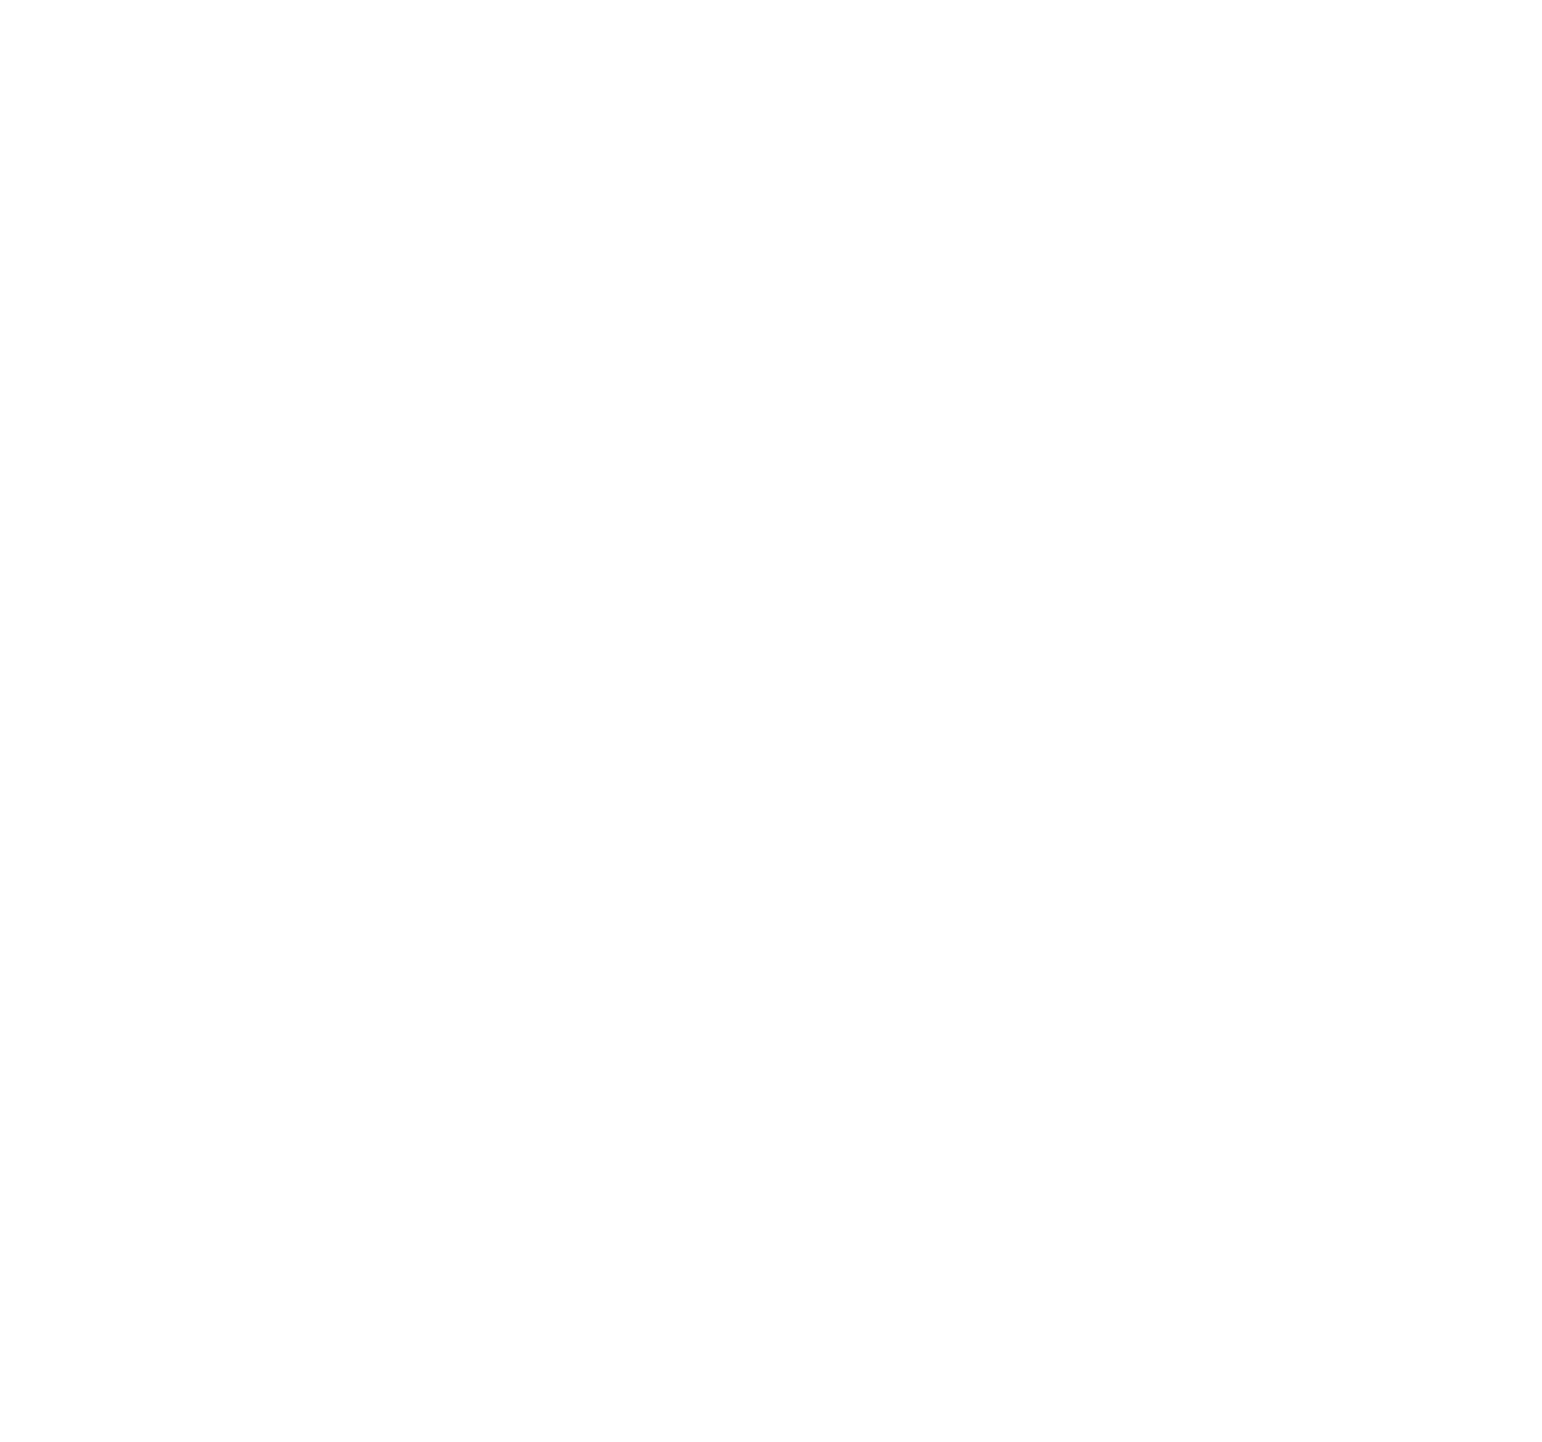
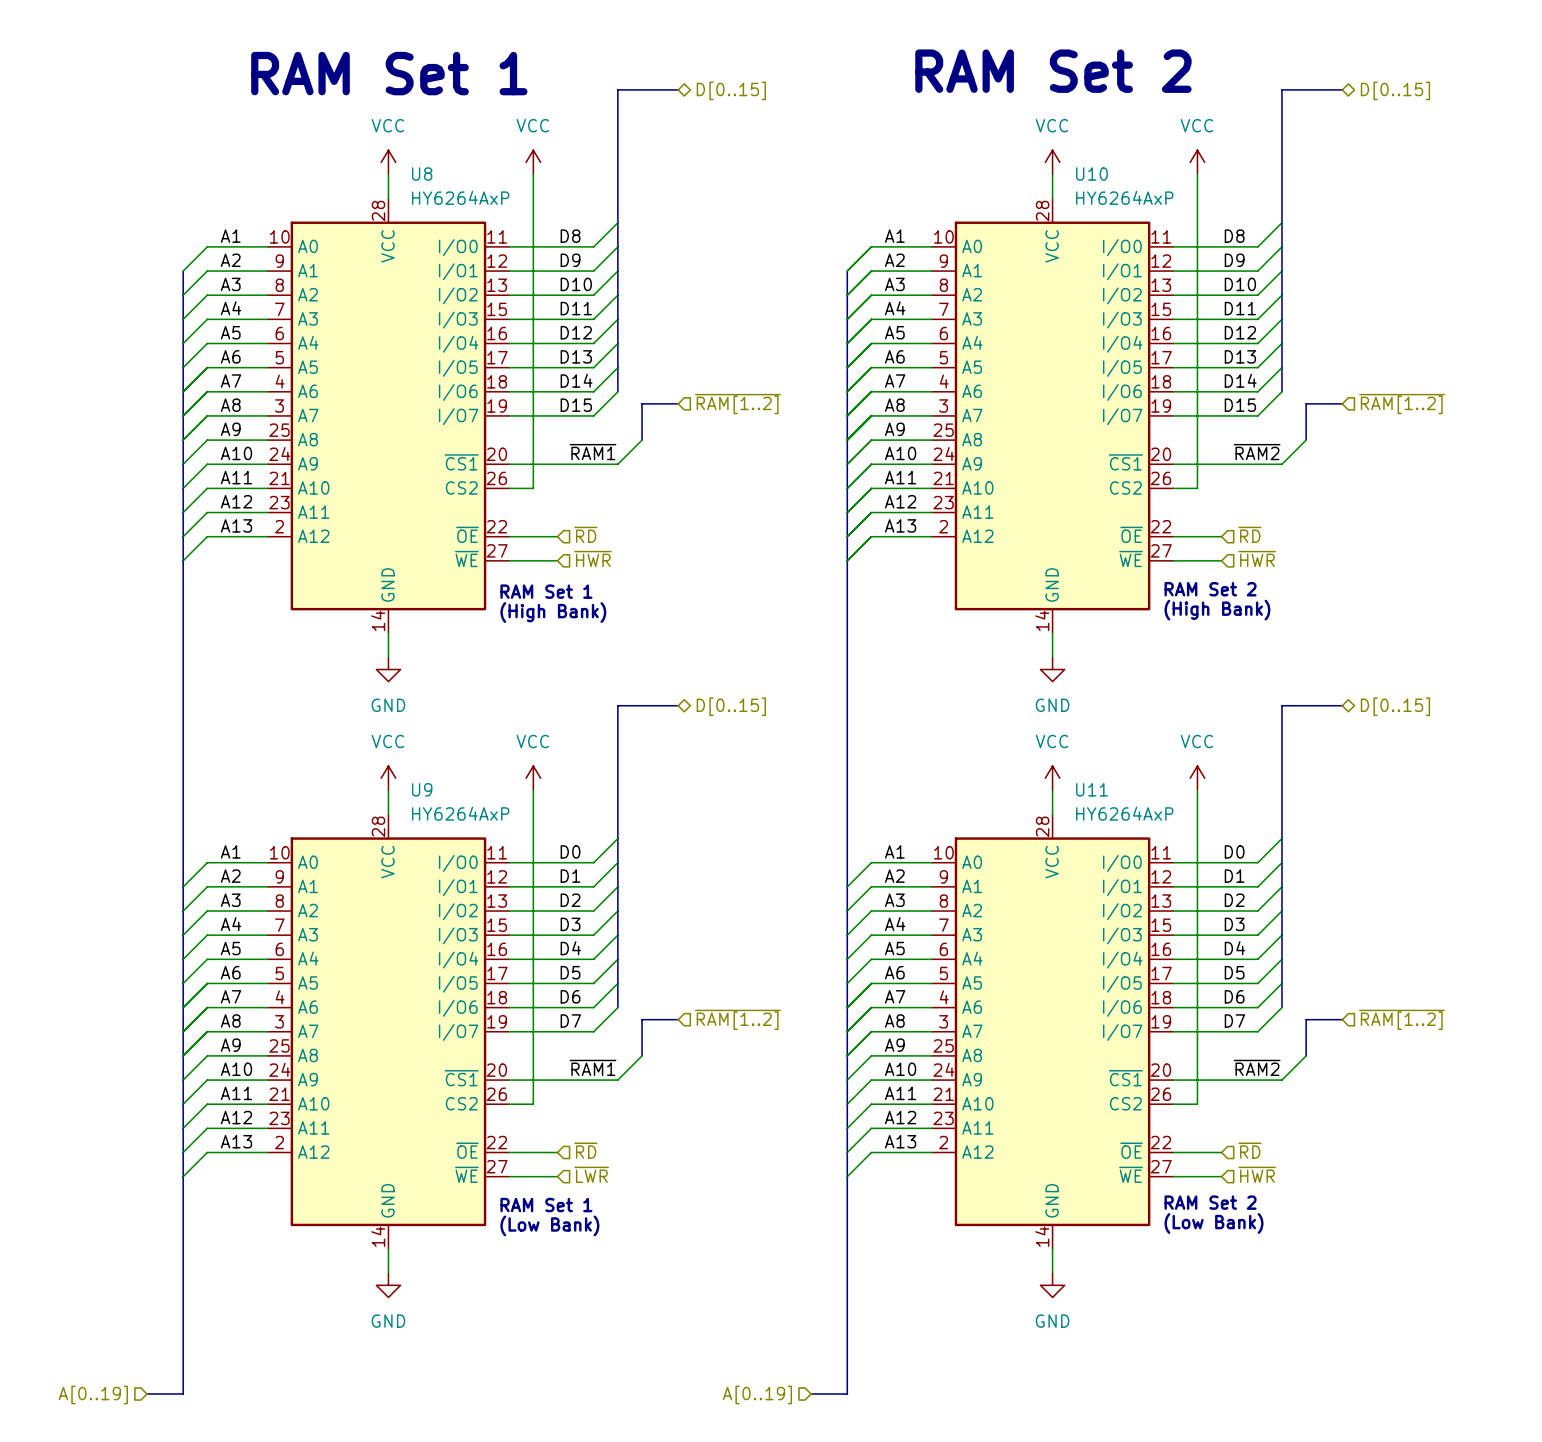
text: none -> RAM Set 2 (1053, 71)
text: none -> RAM Set 1 (389, 73)
bus: none -> (678, 89) (617, 89) (617, 391)
bus: none -> (1342, 89) (1281, 89) (1281, 391)
hierarchical label: none -> D[0..15] (731, 90)
hierarchical label: none -> D[0..15] (1395, 90)
power symbol: none -> VCC (388, 162)
power symbol: none -> VCC (533, 162)
power symbol: none -> VCC (1052, 162)
power symbol: none -> VCC (1197, 162)
wire: none -> (388, 174) (388, 198)
wire: none -> (533, 174) (533, 488) (509, 488)
wire: none -> (1052, 174) (1052, 198)
wire: none -> (1197, 174) (1197, 488) (1173, 488)
wire: none -> (617, 222) (593, 246) (509, 246)
wire: none -> (1281, 222) (1257, 246) (1173, 246)
label: none -> A1 (230, 236)
label: none -> D8 (570, 236)
label: none -> A1 (894, 236)
label: none -> D8 (1234, 236)
wire: none -> (267, 246) (207, 246) (183, 271)
wire: none -> (617, 246) (593, 271) (509, 271)
wire: none -> (931, 246) (871, 246) (847, 271)
wire: none -> (1281, 246) (1257, 271) (1173, 271)
label: none -> A2 (230, 260)
label: none -> D9 (570, 260)
label: none -> A2 (894, 260)
label: none -> D9 (1234, 260)
bus: none -> (183, 271) (183, 1394) (146, 1394)
wire: none -> (267, 271) (207, 271) (183, 295)
wire: none -> (617, 271) (593, 295) (509, 295)
bus: none -> (847, 271) (847, 1394) (811, 1394)
wire: none -> (931, 271) (871, 271) (847, 295)
wire: none -> (1281, 271) (1257, 295) (1173, 295)
label: none -> A3 (230, 284)
label: none -> D10 (576, 284)
label: none -> A3 (894, 284)
label: none -> D10 (1240, 284)
wire: none -> (267, 295) (207, 295) (183, 319)
wire: none -> (617, 295) (593, 319) (509, 319)
wire: none -> (931, 295) (871, 295) (847, 319)
wire: none -> (1281, 295) (1257, 319) (1173, 319)
label: none -> A4 (231, 308)
label: none -> D11 (576, 308)
label: none -> A4 (895, 308)
label: none -> D11 (1240, 308)
wire: none -> (267, 319) (207, 319) (183, 343)
wire: none -> (617, 319) (593, 343) (509, 343)
wire: none -> (931, 319) (871, 319) (847, 343)
wire: none -> (1281, 319) (1257, 343) (1173, 343)
label: none -> A5 (230, 332)
label: none -> D12 (576, 332)
label: none -> A5 (894, 332)
label: none -> D12 (1240, 332)
wire: none -> (267, 343) (207, 343) (183, 367)
wire: none -> (617, 343) (593, 367) (509, 367)
wire: none -> (931, 343) (871, 343) (847, 367)
wire: none -> (1281, 343) (1257, 367) (1173, 367)
label: none -> A6 (230, 356)
label: none -> D13 (576, 356)
label: none -> A6 (894, 356)
label: none -> D13 (1240, 356)
wire: none -> (267, 367) (207, 367) (183, 391)
wire: none -> (617, 367) (593, 391) (509, 391)
wire: none -> (931, 367) (871, 367) (847, 391)
wire: none -> (1281, 367) (1257, 391) (1173, 391)
label: none -> D14 (576, 380)
label: none -> D14 (1240, 380)
label: none -> A7 (231, 381)
label: none -> A7 (895, 381)
wire: none -> (267, 391) (207, 391) (183, 415)
wire: none -> (617, 391) (593, 415) (509, 415)
wire: none -> (931, 391) (871, 391) (847, 415)
wire: none -> (1281, 391) (1257, 415) (1173, 415)
bus: none -> (678, 403) (642, 403) (642, 440)
bus: none -> (1342, 403) (1306, 403) (1306, 440)
hierarchical label: none -> ~{RAM[1..2]} (737, 404)
hierarchical label: none -> ~{RAM[1..2]} (1402, 404)
label: none -> A8 (230, 405)
label: none -> D15 (576, 405)
label: none -> A8 (894, 405)
label: none -> D15 (1240, 405)
wire: none -> (267, 415) (207, 415) (183, 440)
U8: none -> HY6264AxP (388, 415)
wire: none -> (931, 415) (871, 415) (847, 440)
U10: none -> HY6264AxP (1052, 415)
label: none -> A9 (230, 429)
label: none -> A9 (894, 429)
wire: none -> (267, 440) (207, 440) (183, 464)
wire: none -> (642, 440) (617, 464) (509, 464)
wire: none -> (931, 440) (871, 440) (847, 464)
wire: none -> (1306, 440) (1281, 464) (1173, 464)
label: none -> ~{RAM1} (593, 452)
label: none -> ~{RAM2} (1257, 452)
label: none -> A10 (236, 453)
label: none -> A10 (900, 453)
wire: none -> (267, 464) (207, 464) (183, 488)
wire: none -> (931, 464) (871, 464) (847, 488)
label: none -> A11 (236, 477)
label: none -> A11 (900, 477)
wire: none -> (267, 488) (207, 488) (183, 512)
wire: none -> (931, 488) (871, 488) (847, 512)
label: none -> A12 (236, 501)
label: none -> A12 (900, 501)
wire: none -> (267, 512) (207, 512) (183, 536)
wire: none -> (931, 512) (871, 512) (847, 536)
label: none -> A13 (236, 525)
label: none -> A13 (900, 525)
hierarchical label: none -> ~{RD} (585, 534)
hierarchical label: none -> ~{RD} (1249, 534)
wire: none -> (267, 536) (207, 536) (183, 560)
wire: none -> (509, 536) (557, 536)
wire: none -> (931, 536) (871, 536) (847, 560)
wire: none -> (1173, 536) (1221, 536)
hierarchical label: none -> ~{HWR} (593, 559)
hierarchical label: none -> ~{HWR} (1257, 559)
wire: none -> (509, 560) (557, 560)
wire: none -> (1173, 560) (1221, 560)
text: none -> RAM Set 2 (1210, 589)
text: none -> RAM Set 1 (546, 591)
text: none -> (High Bank) (1217, 610)
text: none -> (High Bank) (553, 612)
wire: none -> (388, 633) (388, 657)
wire: none -> (1052, 633) (1052, 657)
power symbol: none -> GND (388, 669)
power symbol: none -> GND (1052, 669)
bus: none -> (678, 705) (617, 705) (617, 1007)
bus: none -> (1342, 705) (1281, 705) (1281, 1007)
hierarchical label: none -> D[0..15] (731, 706)
hierarchical label: none -> D[0..15] (1395, 706)
power symbol: none -> VCC (388, 778)
power symbol: none -> VCC (533, 778)
power symbol: none -> VCC (1052, 778)
power symbol: none -> VCC (1197, 778)
wire: none -> (388, 790) (388, 814)
wire: none -> (533, 790) (533, 1104) (509, 1104)
wire: none -> (1052, 790) (1052, 814)
wire: none -> (1197, 790) (1197, 1104) (1173, 1104)
wire: none -> (617, 838) (593, 862) (509, 862)
wire: none -> (1281, 838) (1257, 862) (1173, 862)
label: none -> A1 (230, 851)
label: none -> D0 (570, 851)
label: none -> A1 (894, 851)
label: none -> D0 (1234, 851)
wire: none -> (267, 862) (207, 862) (183, 886)
wire: none -> (617, 862) (593, 886) (509, 886)
wire: none -> (931, 862) (871, 862) (847, 886)
wire: none -> (1281, 862) (1257, 886) (1173, 886)
label: none -> A2 (230, 876)
label: none -> D1 (570, 876)
label: none -> A2 (894, 876)
label: none -> D1 (1234, 876)
wire: none -> (267, 886) (207, 886) (183, 911)
wire: none -> (617, 886) (593, 911) (509, 911)
wire: none -> (931, 886) (871, 886) (847, 911)
wire: none -> (1281, 886) (1257, 911) (1173, 911)
label: none -> A3 (230, 900)
label: none -> D2 (570, 900)
label: none -> A3 (894, 900)
label: none -> D2 (1234, 900)
wire: none -> (267, 911) (207, 911) (183, 935)
wire: none -> (617, 911) (593, 935) (509, 935)
wire: none -> (931, 911) (871, 911) (847, 935)
wire: none -> (1281, 911) (1257, 935) (1173, 935)
label: none -> A4 (231, 924)
label: none -> D3 (570, 924)
label: none -> A4 (895, 924)
label: none -> D3 (1234, 924)
wire: none -> (267, 935) (207, 935) (183, 959)
wire: none -> (617, 935) (593, 959) (509, 959)
wire: none -> (931, 935) (871, 935) (847, 959)
wire: none -> (1281, 935) (1257, 959) (1173, 959)
label: none -> A5 (230, 948)
label: none -> D4 (570, 948)
label: none -> A5 (894, 948)
label: none -> D4 (1234, 948)
wire: none -> (267, 959) (207, 959) (183, 983)
wire: none -> (617, 959) (593, 983) (509, 983)
wire: none -> (931, 959) (871, 959) (847, 983)
wire: none -> (1281, 959) (1257, 983) (1173, 983)
label: none -> A6 (230, 972)
label: none -> D5 (570, 972)
label: none -> A6 (894, 972)
label: none -> D5 (1234, 972)
wire: none -> (267, 983) (207, 983) (183, 1007)
wire: none -> (617, 983) (593, 1007) (509, 1007)
wire: none -> (931, 983) (871, 983) (847, 1007)
wire: none -> (1281, 983) (1257, 1007) (1173, 1007)
label: none -> A7 (231, 996)
label: none -> D6 (570, 996)
label: none -> A7 (895, 996)
label: none -> D6 (1234, 996)
wire: none -> (267, 1007) (207, 1007) (183, 1031)
wire: none -> (617, 1007) (593, 1031) (509, 1031)
wire: none -> (931, 1007) (871, 1007) (847, 1031)
wire: none -> (1281, 1007) (1257, 1031) (1173, 1031)
bus: none -> (678, 1019) (642, 1019) (642, 1055)
hierarchical label: none -> ~{RAM[1..2]} (737, 1019)
bus: none -> (1342, 1019) (1306, 1019) (1306, 1055)
hierarchical label: none -> ~{RAM[1..2]} (1402, 1019)
label: none -> A8 (230, 1020)
label: none -> D7 (570, 1020)
label: none -> A8 (894, 1020)
label: none -> D7 (1234, 1020)
wire: none -> (267, 1031) (207, 1031) (183, 1055)
U9: none -> HY6264AxP (388, 1031)
wire: none -> (931, 1031) (871, 1031) (847, 1055)
U11: none -> HY6264AxP (1052, 1031)
label: none -> A9 (230, 1045)
label: none -> A9 (894, 1045)
wire: none -> (267, 1055) (207, 1055) (183, 1080)
wire: none -> (642, 1055) (617, 1080) (509, 1080)
wire: none -> (931, 1055) (871, 1055) (847, 1080)
wire: none -> (1306, 1055) (1281, 1080) (1173, 1080)
label: none -> ~{RAM1} (593, 1067)
label: none -> ~{RAM2} (1257, 1067)
label: none -> A10 (236, 1069)
label: none -> A10 (900, 1069)
wire: none -> (267, 1080) (207, 1080) (183, 1104)
wire: none -> (931, 1080) (871, 1080) (847, 1104)
label: none -> A11 (236, 1093)
label: none -> A11 (900, 1093)
wire: none -> (267, 1104) (207, 1104) (183, 1128)
wire: none -> (931, 1104) (871, 1104) (847, 1128)
label: none -> A12 (236, 1117)
label: none -> A12 (900, 1117)
wire: none -> (267, 1128) (207, 1128) (183, 1152)
wire: none -> (931, 1128) (871, 1128) (847, 1152)
label: none -> A13 (236, 1141)
label: none -> A13 (900, 1141)
hierarchical label: none -> ~{RD} (585, 1150)
hierarchical label: none -> ~{RD} (1249, 1150)
wire: none -> (267, 1152) (207, 1152) (183, 1176)
wire: none -> (509, 1152) (557, 1152)
wire: none -> (931, 1152) (871, 1152) (847, 1176)
wire: none -> (1173, 1152) (1221, 1152)
hierarchical label: none -> ~{LWR} (591, 1174)
hierarchical label: none -> ~{HWR} (1257, 1174)
wire: none -> (509, 1176) (557, 1176)
wire: none -> (1173, 1176) (1221, 1176)
text: none -> RAM Set 2 (1210, 1202)
text: none -> RAM Set 1 (546, 1205)
text: none -> (Low Bank) (1214, 1223)
text: none -> (Low Bank) (549, 1225)
wire: none -> (388, 1249) (388, 1273)
wire: none -> (1052, 1249) (1052, 1273)
power symbol: none -> GND (388, 1285)
power symbol: none -> GND (1052, 1285)
hierarchical label: none -> A[0..19] (93, 1394)
hierarchical label: none -> A[0..19] (757, 1394)

